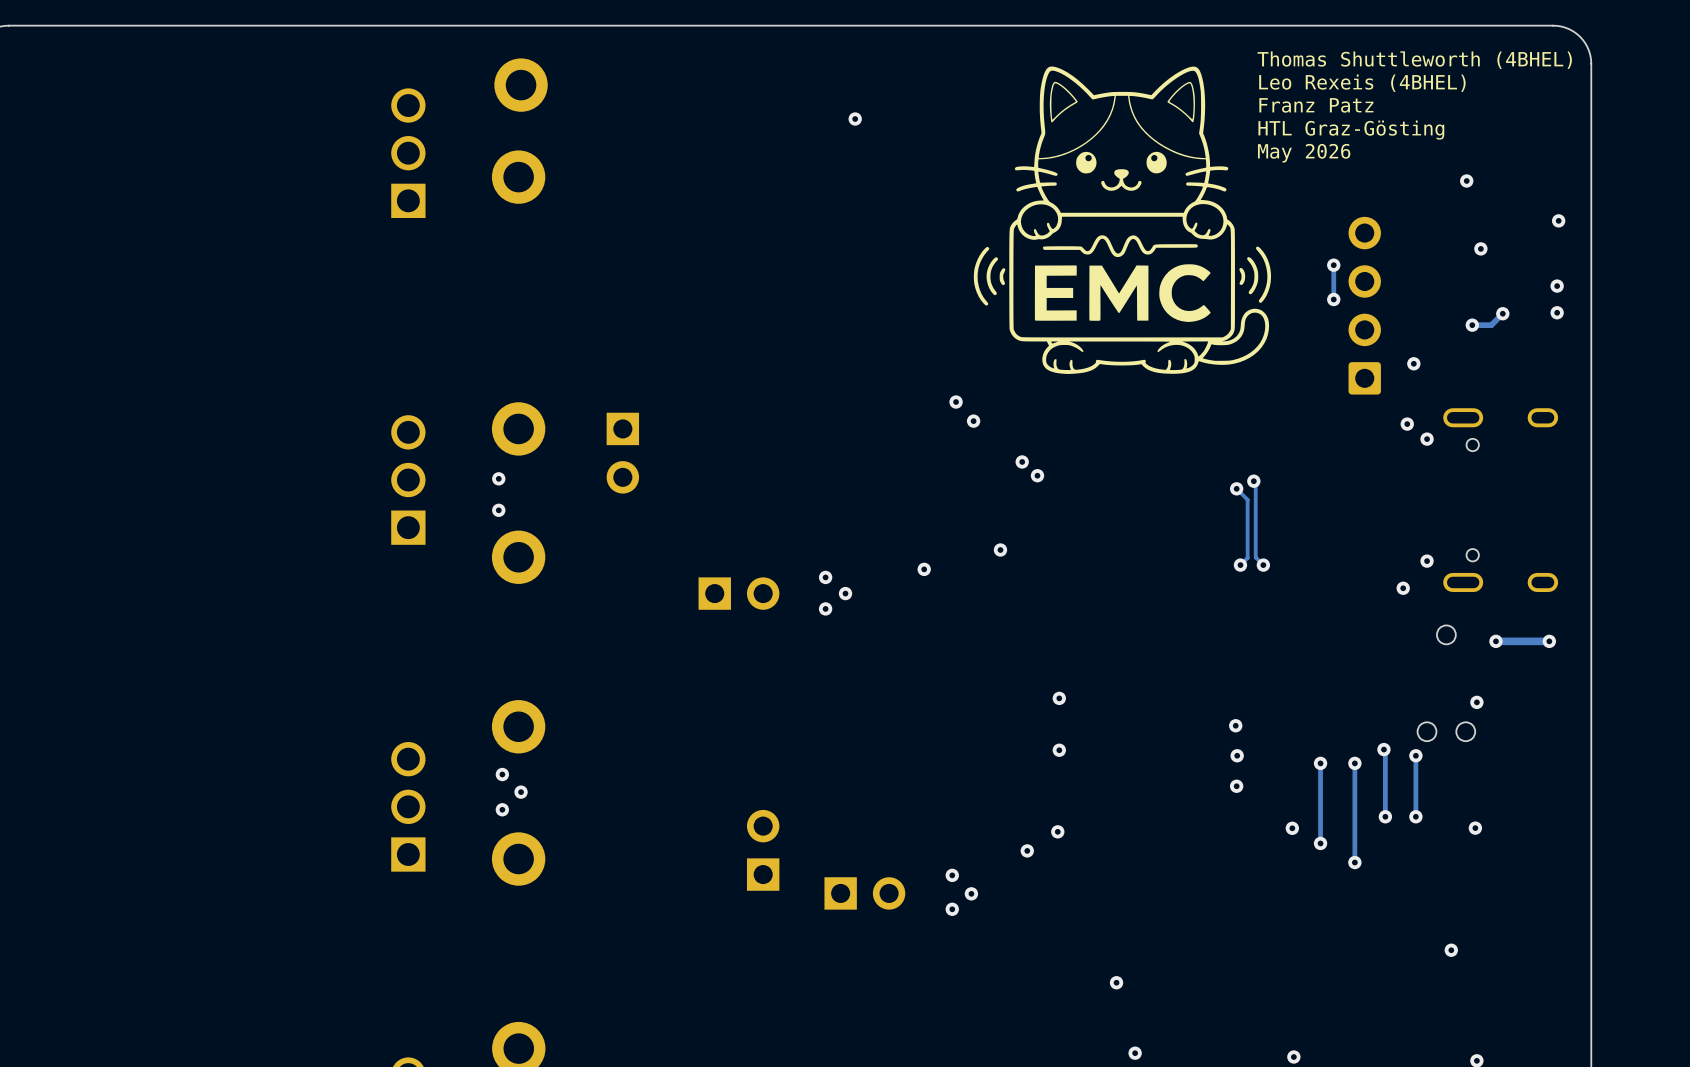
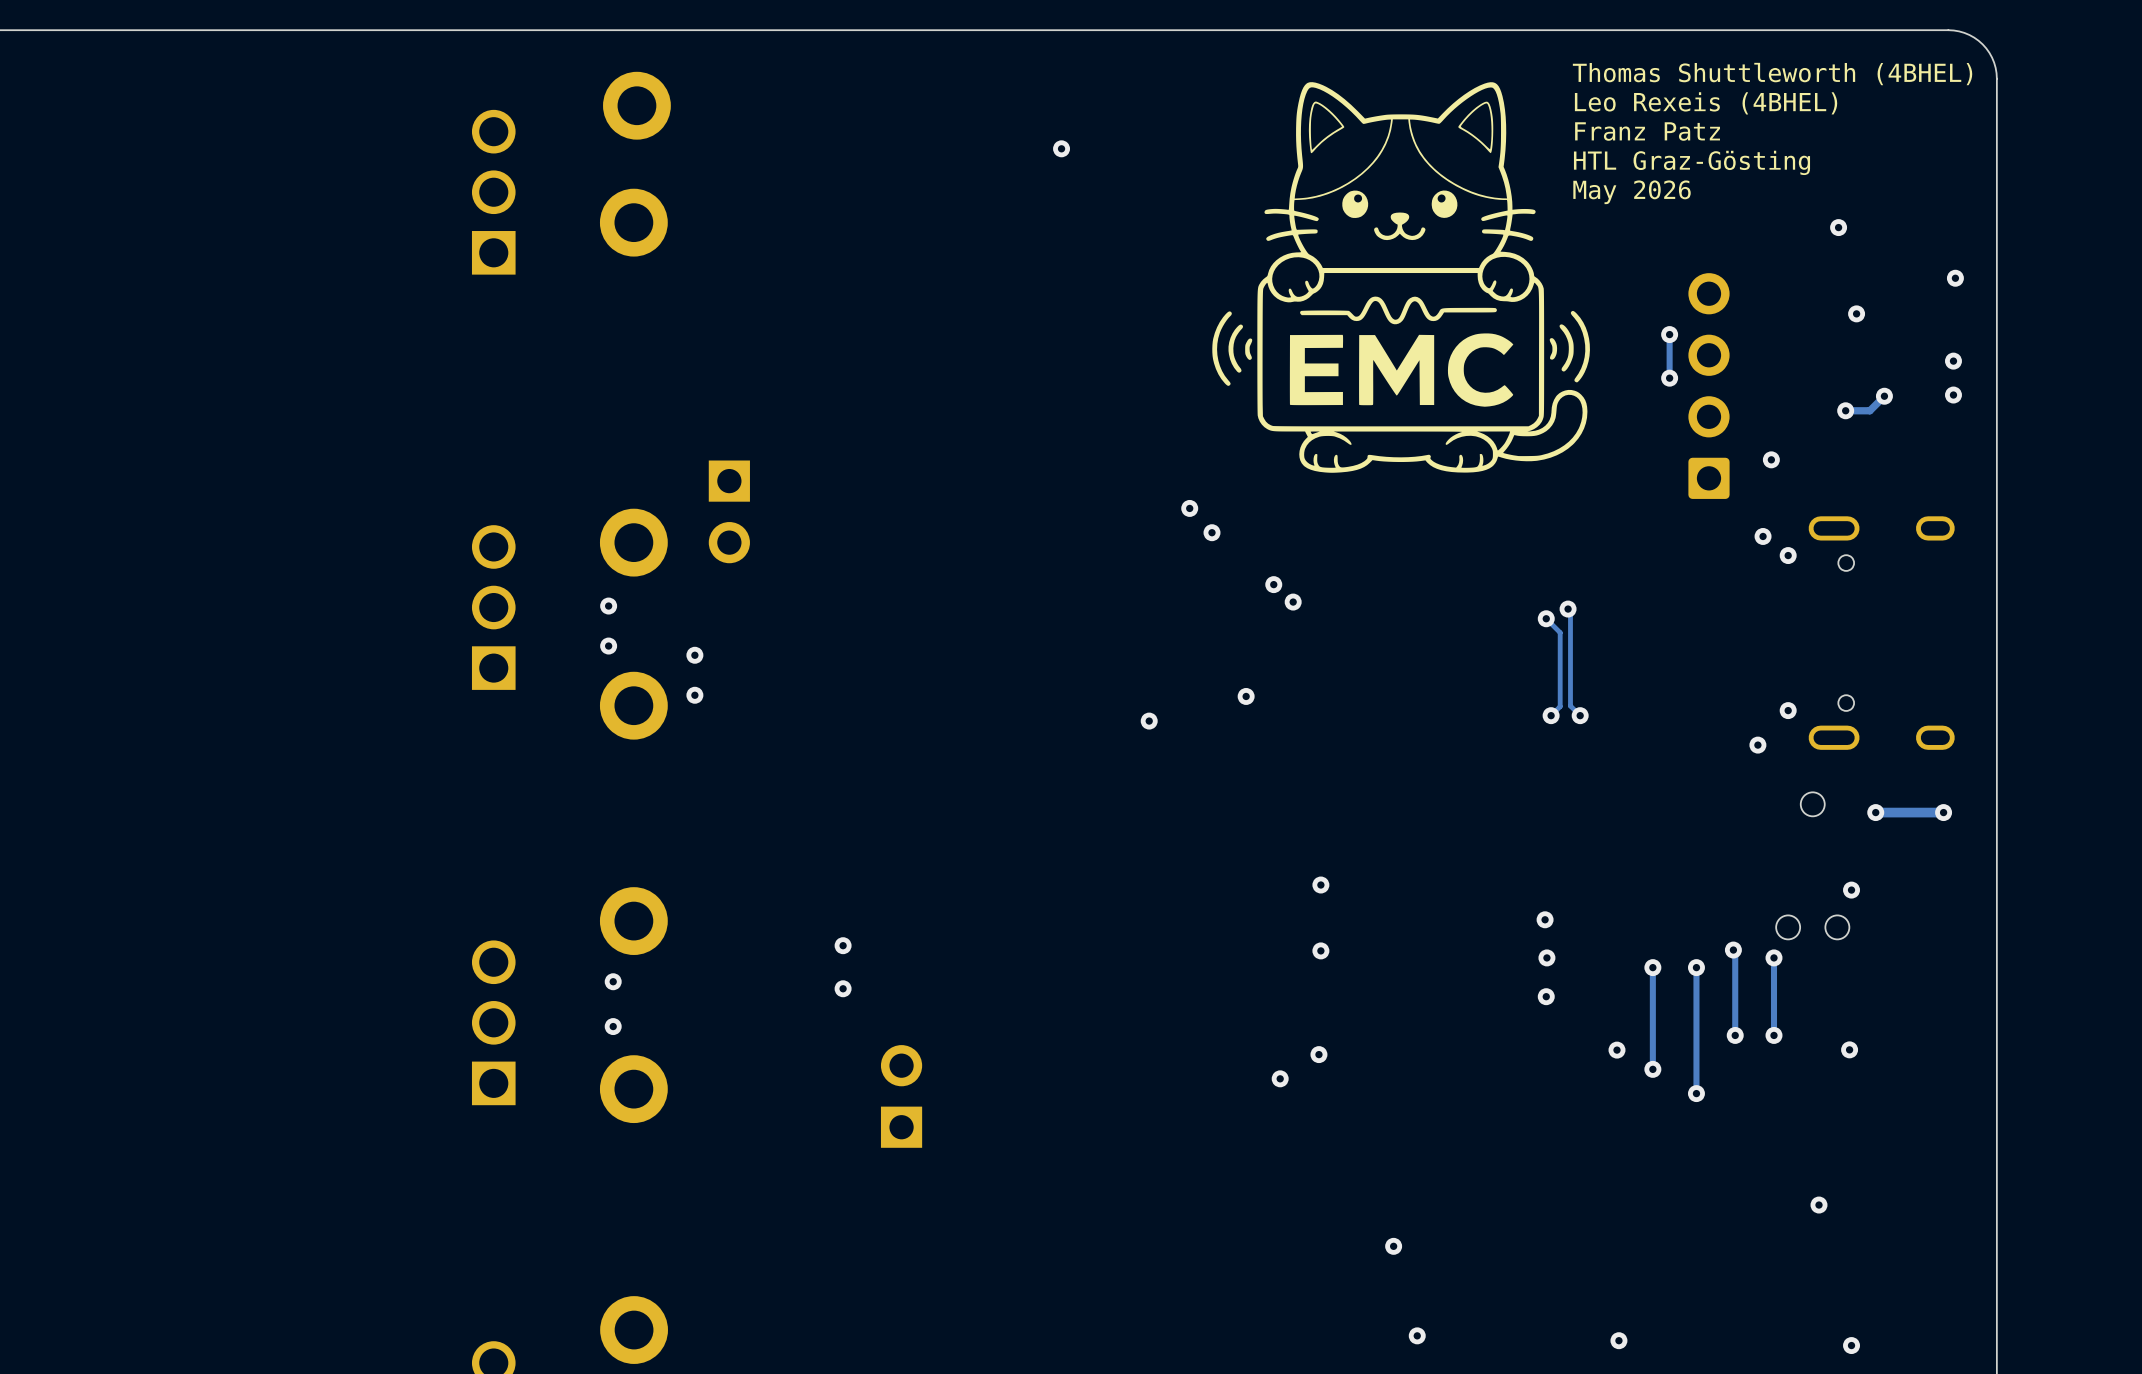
part position: (622, 453) -> (729, 511)
via: none -> (694, 655)
via: none -> (694, 695)
via: (825, 577) -> none
part: (738, 593) -> none
via: (845, 593) -> none
via: (825, 608) -> none
via: none -> (843, 945)
via: none -> (843, 988)
via: (521, 792) -> none
part position: (763, 850) -> (901, 1096)
via: (952, 875) -> none
part: (864, 893) -> none
via: (971, 893) -> none
via: (952, 909) -> none

